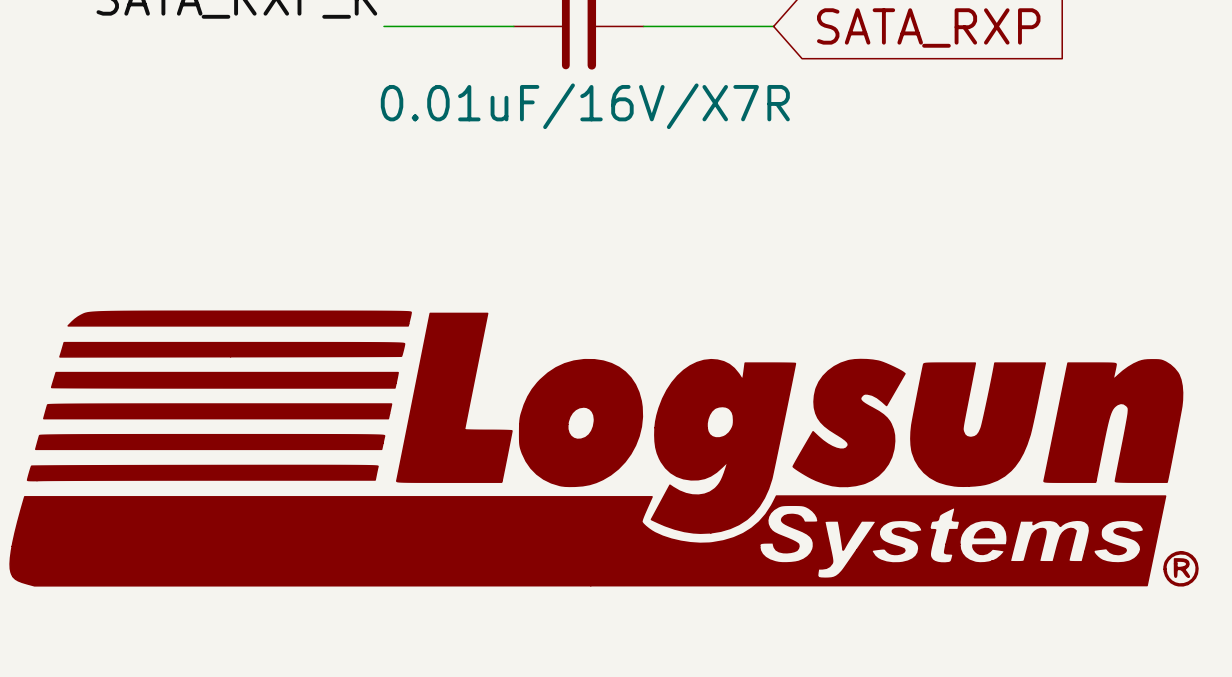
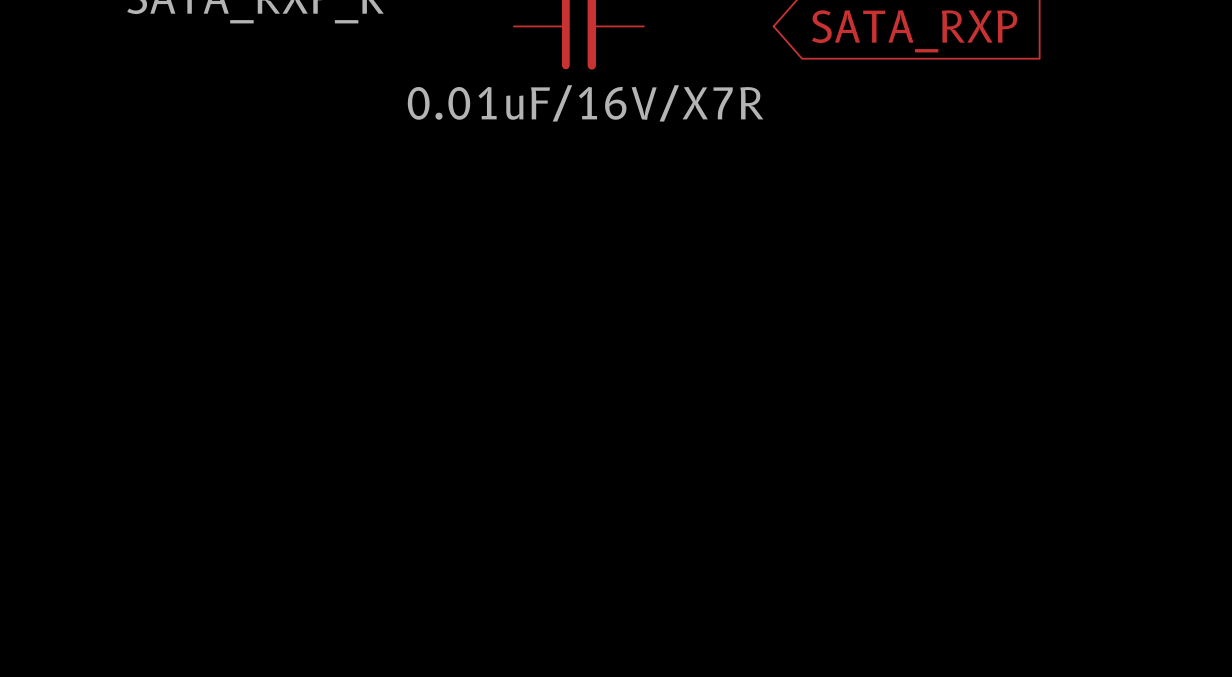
wire: (383, 26) (513, 26) -> none
wire: (643, 26) (773, 26) -> none
drawing: [9, 311, 1199, 586] -> none

